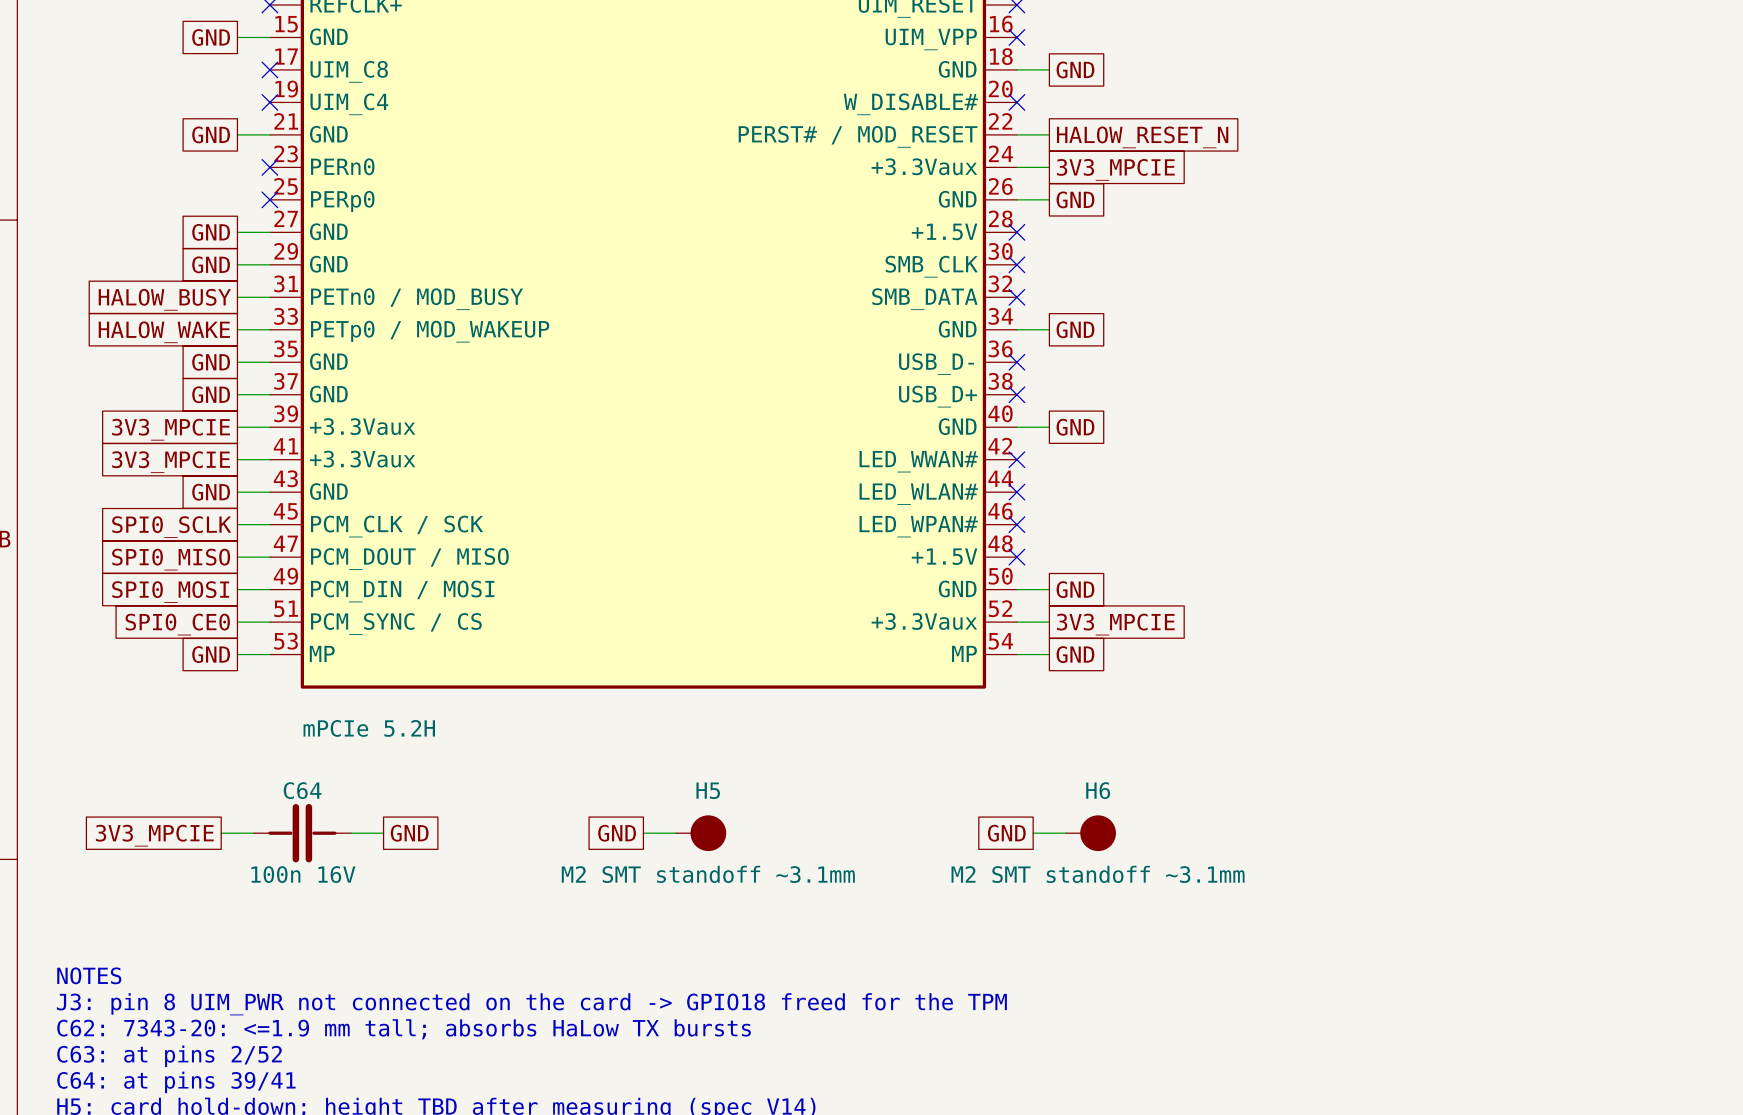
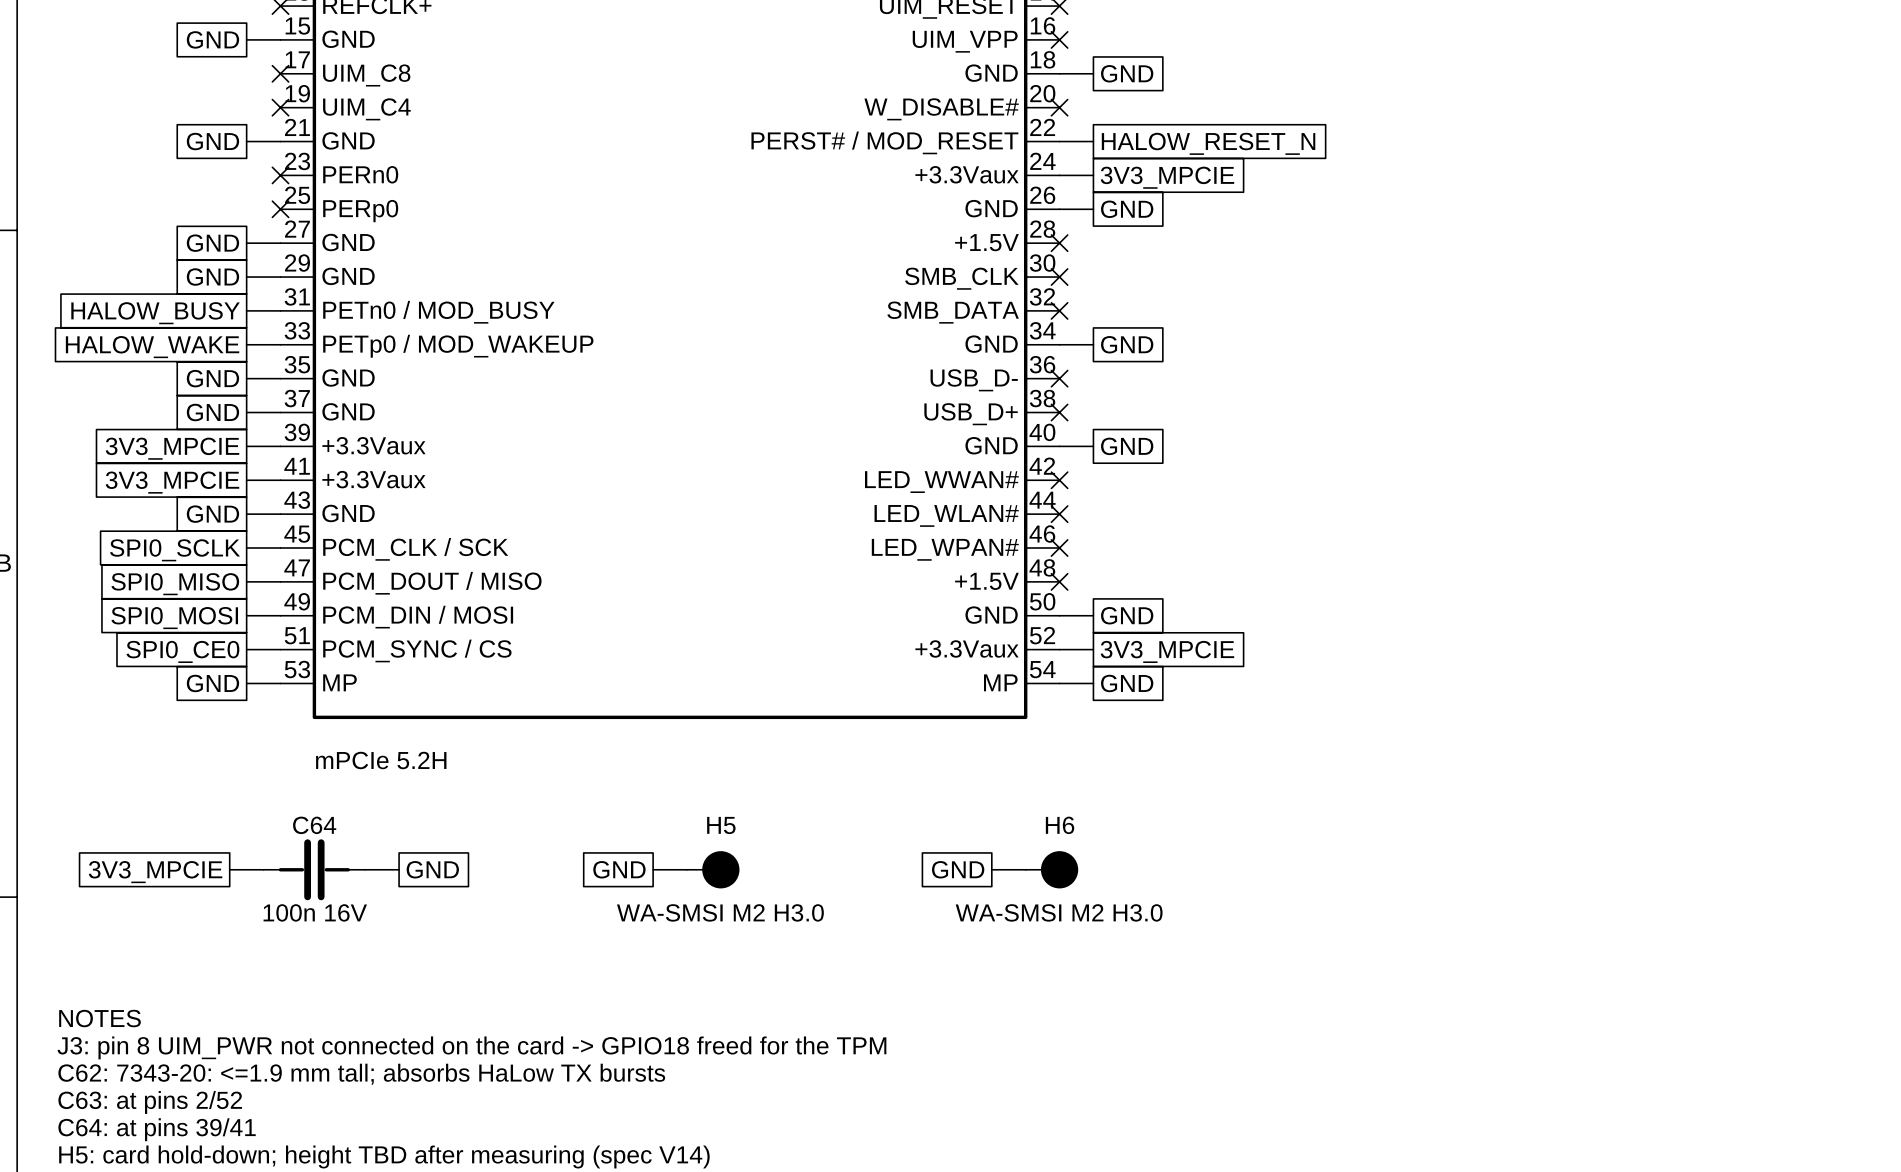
global label position: GND (617, 833) -> GND (619, 869)
H5 position: (701, 833) -> (713, 869)
global label position: GND (1006, 833) -> GND (958, 869)
wire: (1033, 833) (1065, 833) -> (991, 869) (1025, 869)
H6 position: (1090, 833) -> (1051, 869)
H5 value: M2 SMT standoff ~3.1mm (708, 874) -> WA-SMSI M2 H3.0 (720, 912)
H6 value: M2 SMT standoff ~3.1mm (1098, 874) -> WA-SMSI M2 H3.0 (1059, 912)

